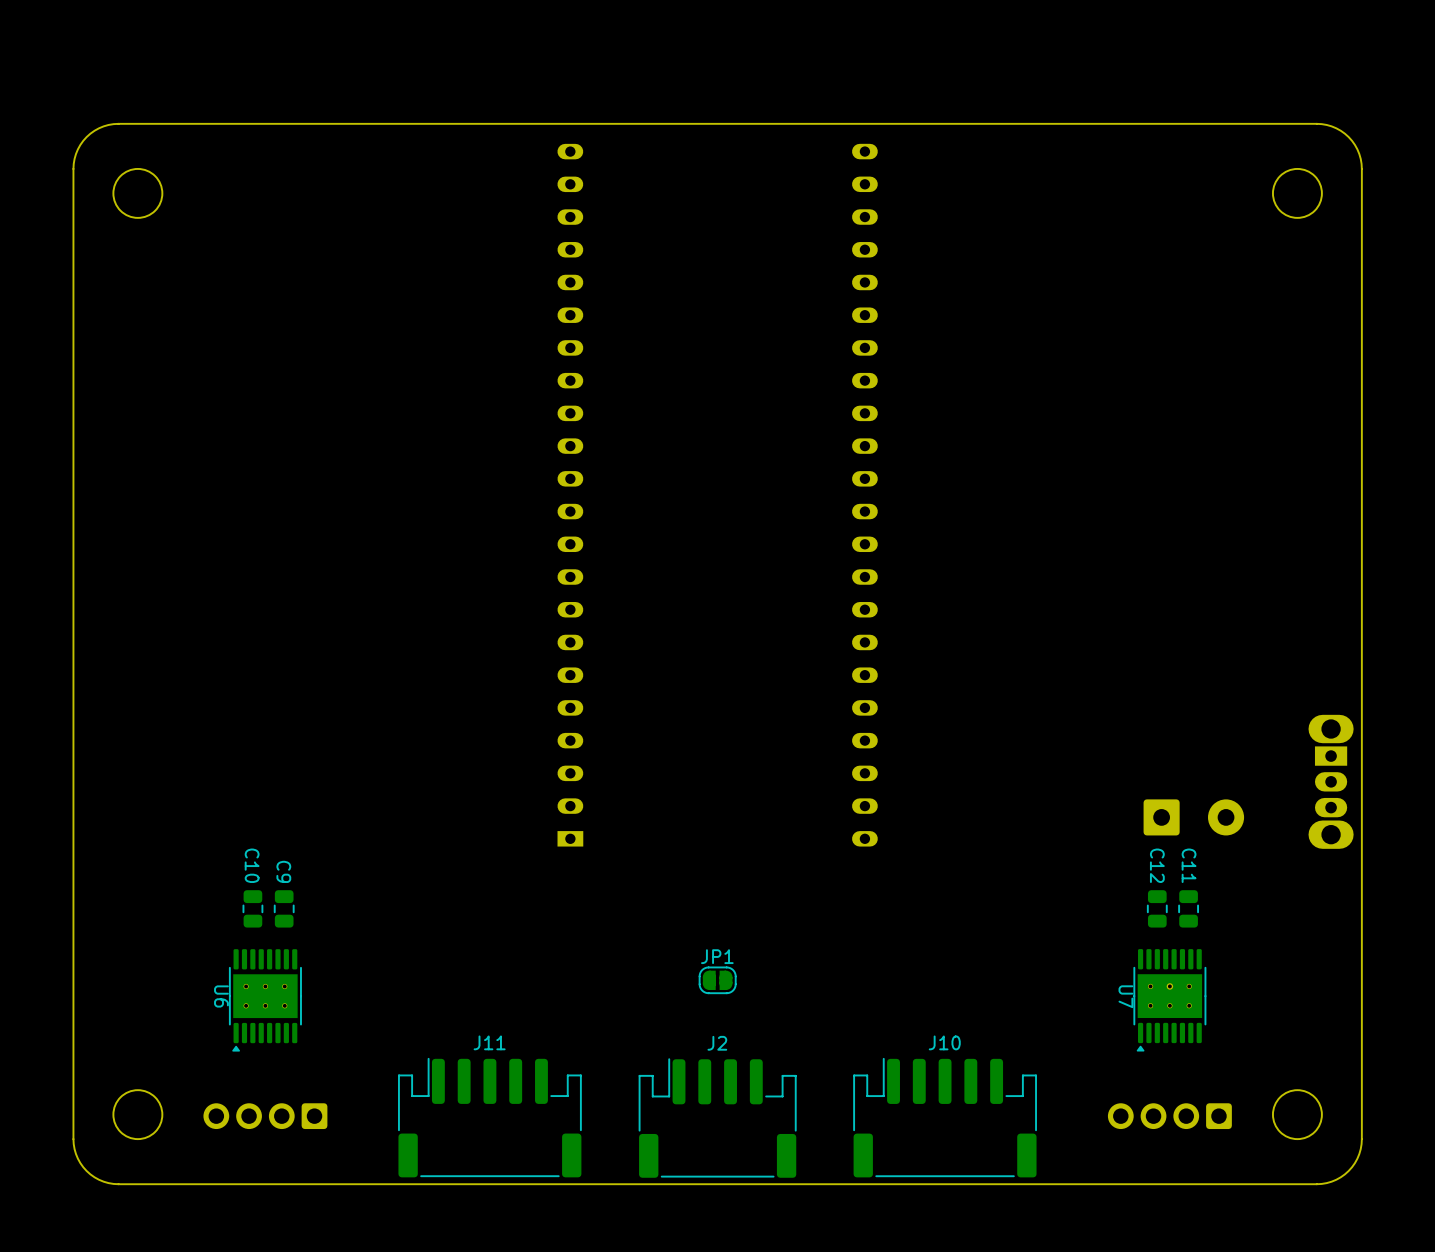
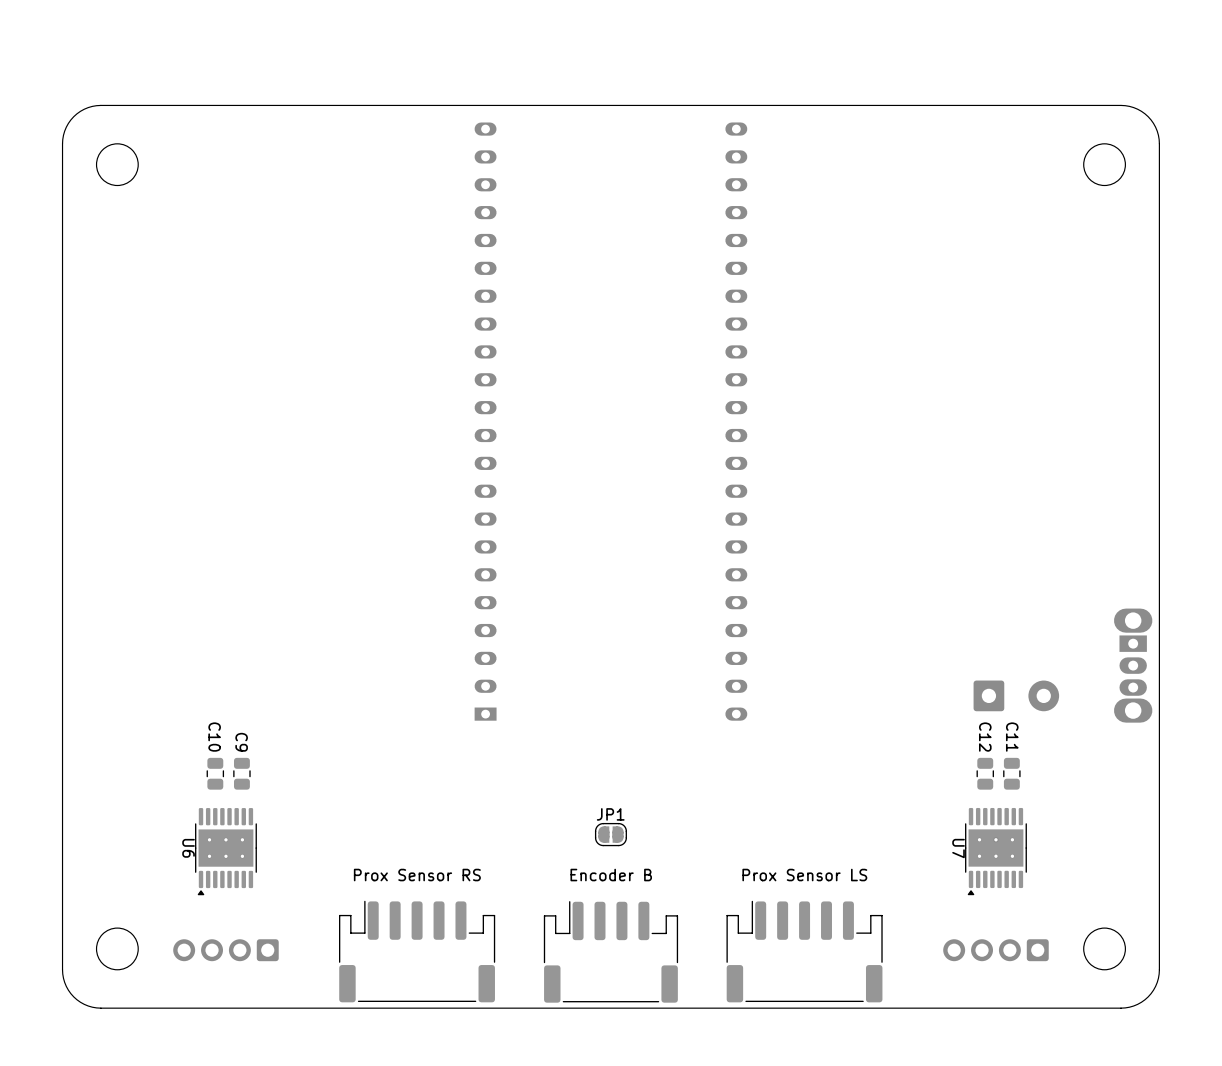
J11 value: none -> Prox Sensor RS (417, 875)
J2 value: none -> Encoder B (611, 875)
J10 value: none -> Prox Sensor LS (804, 875)
J11 name: J11 (489, 1042) -> none
J10 name: J10 (944, 1042) -> none
J2 name: J2 (717, 1043) -> none

